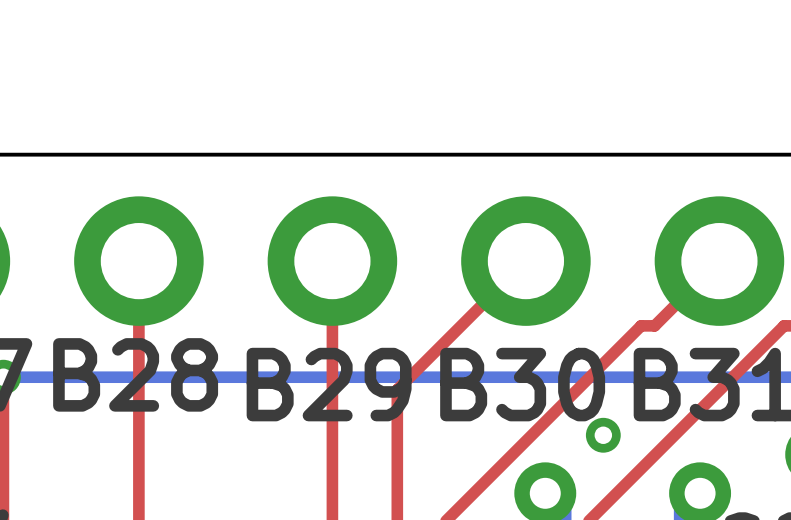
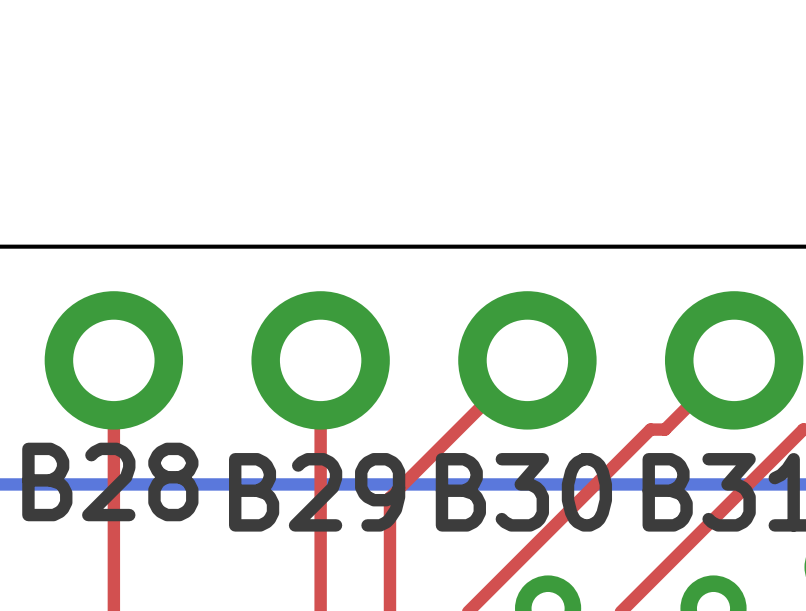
via: (603, 435) -> none

